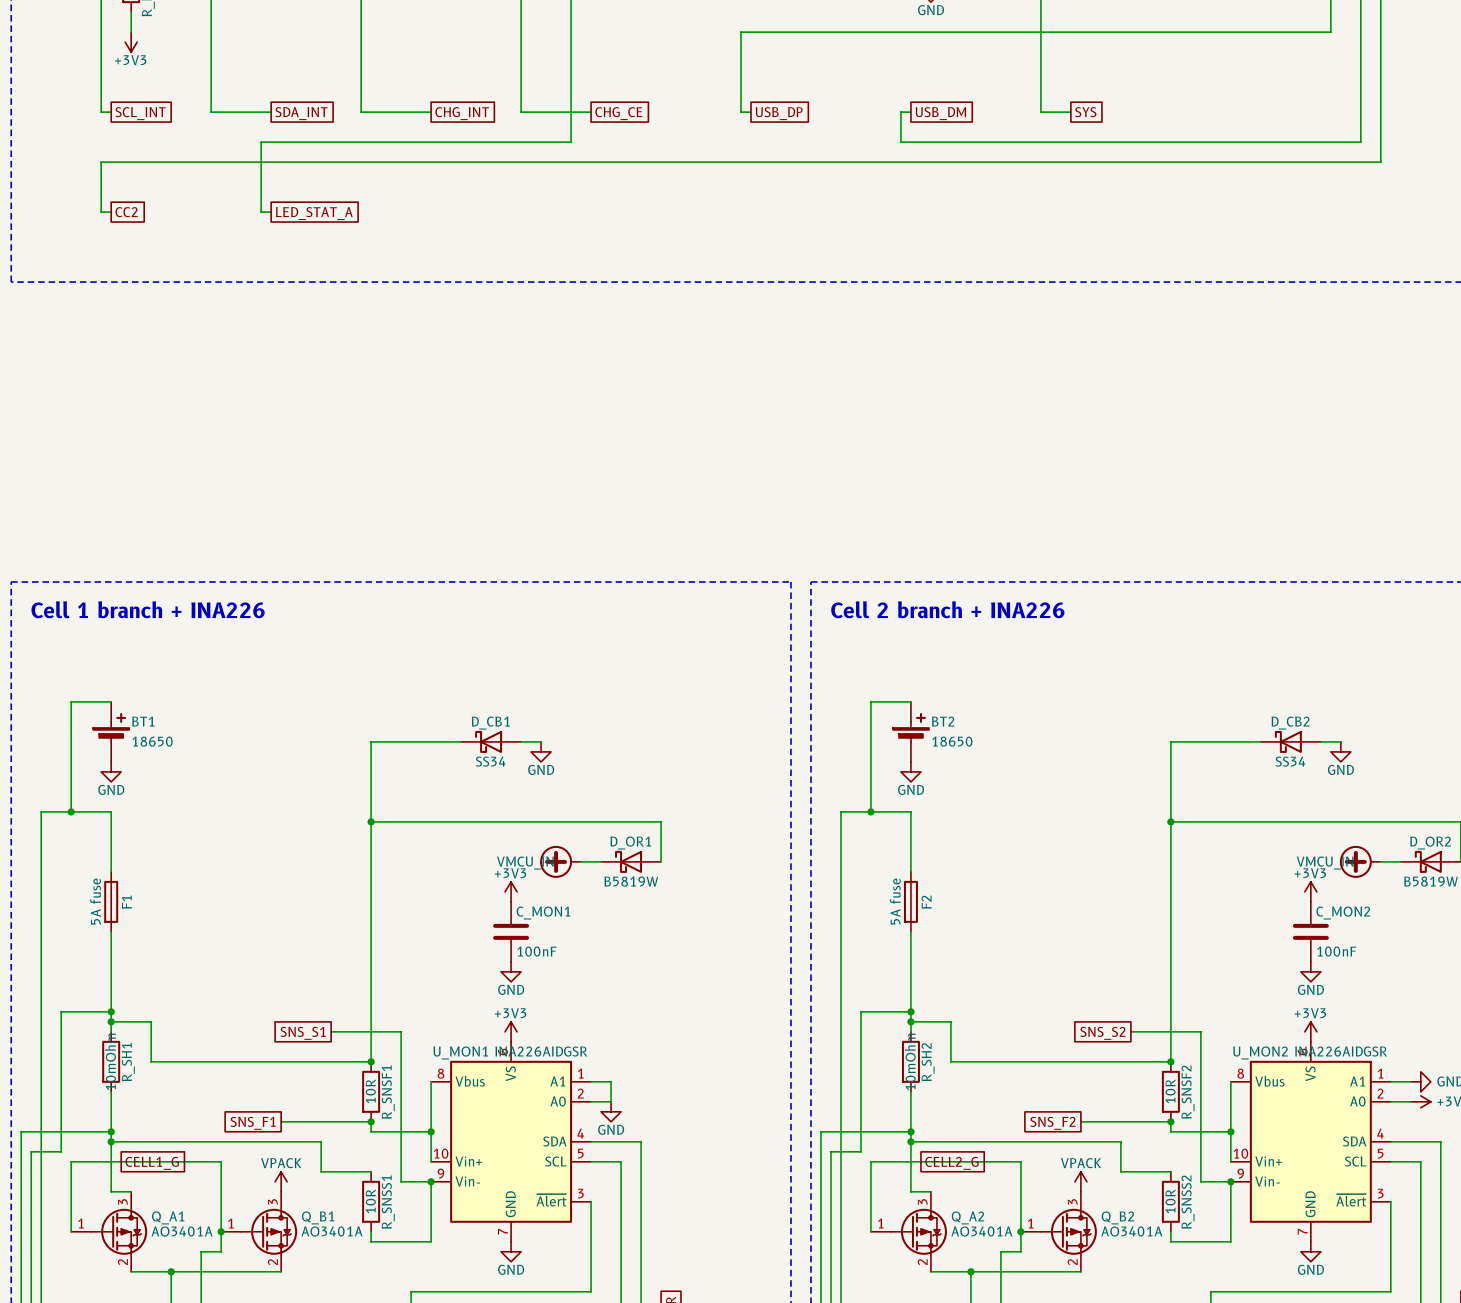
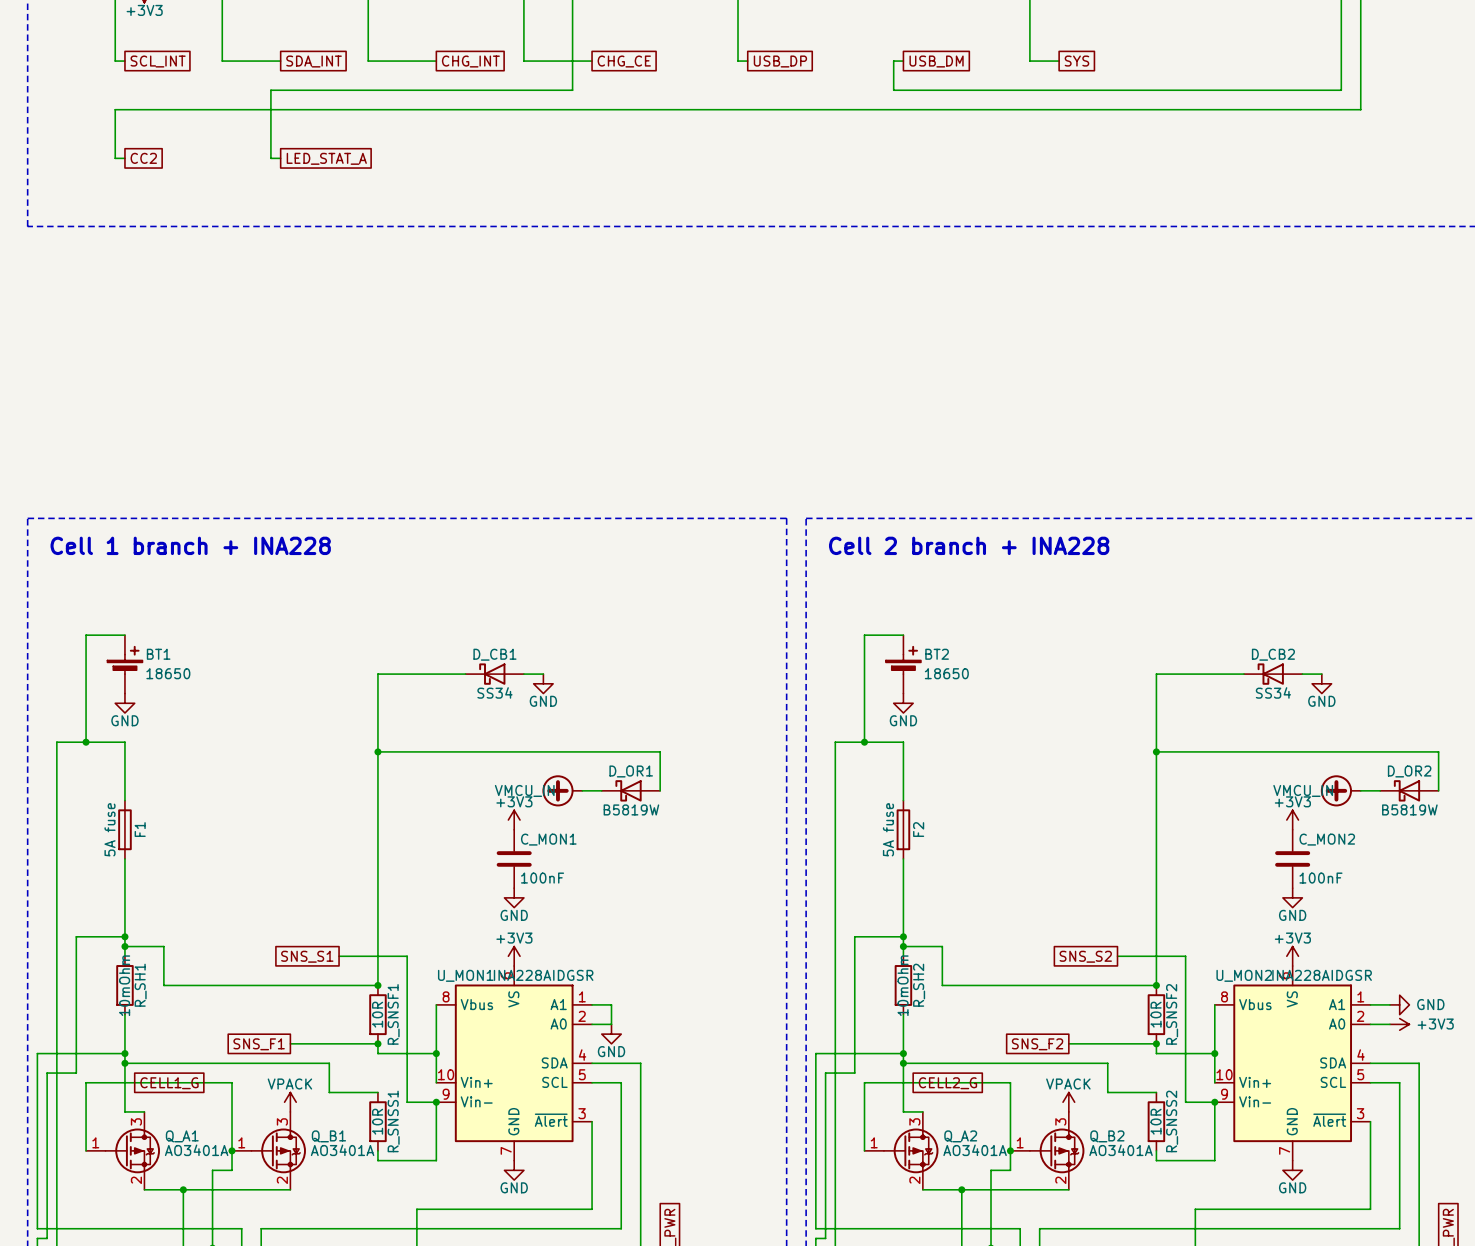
text: Cell 1 branch + INA226 (148, 609) -> Cell 1 branch + INA228 (190, 545)
text: Cell 2 branch + INA226 (947, 609) -> Cell 2 branch + INA228 (969, 545)
U_MON1 value: INA226AIDGSR (541, 1051) -> INA228AIDGSR (543, 975)
U_MON2 value: INA226AIDGSR (1341, 1051) -> INA228AIDGSR (1322, 975)

